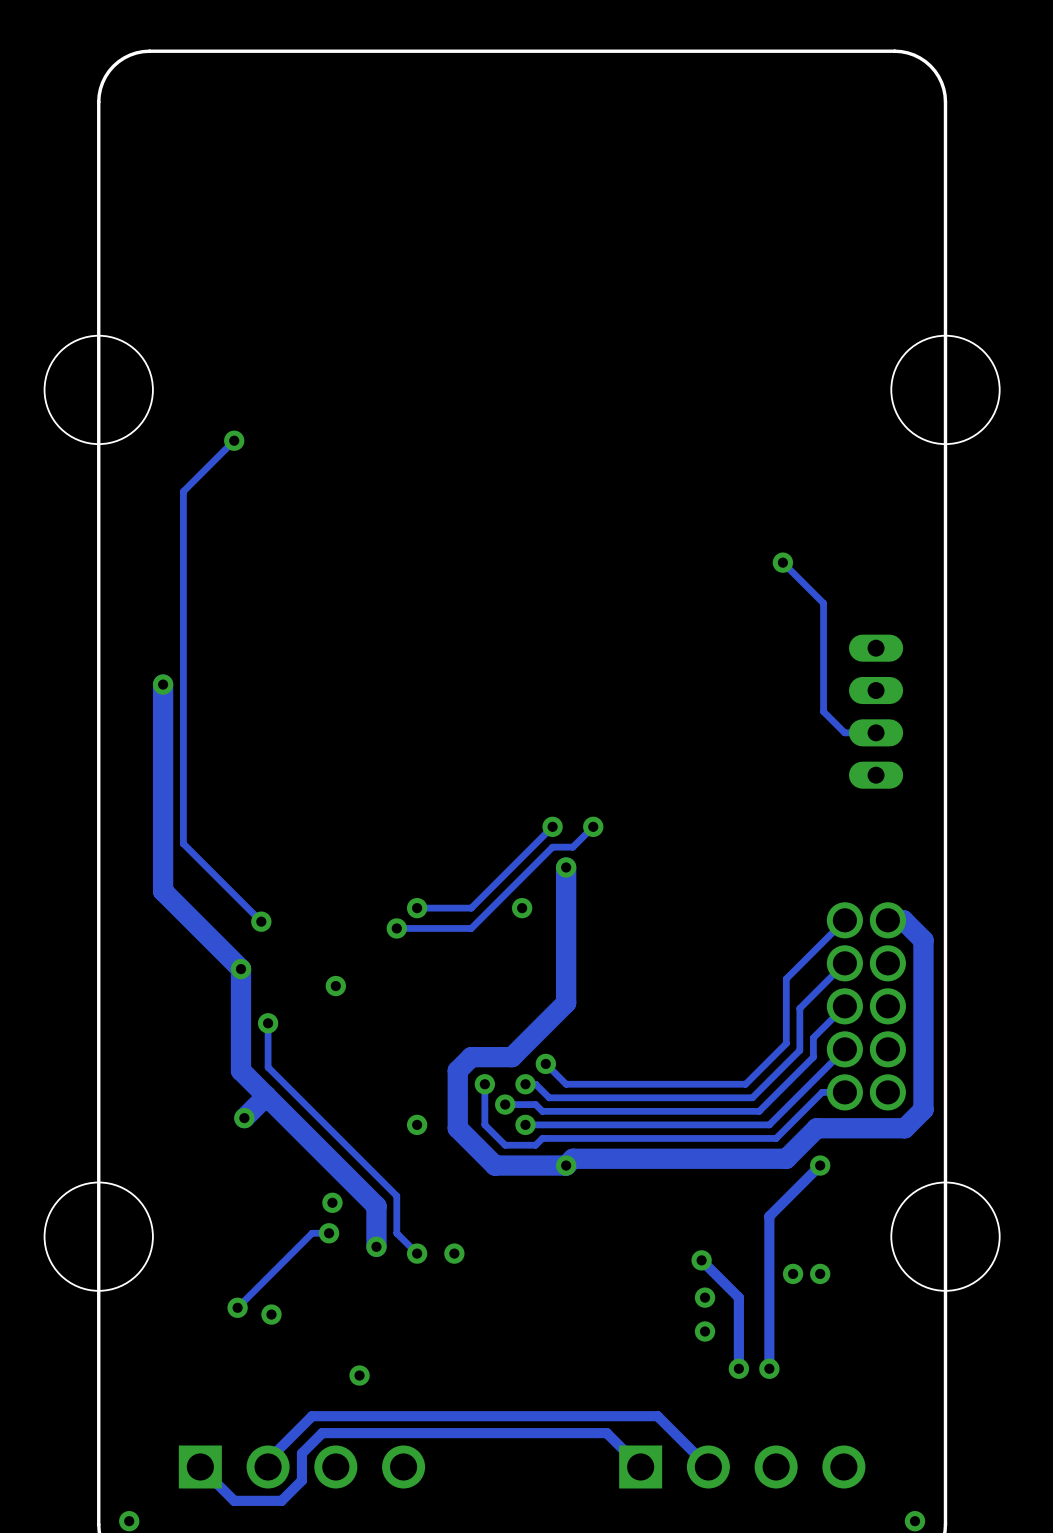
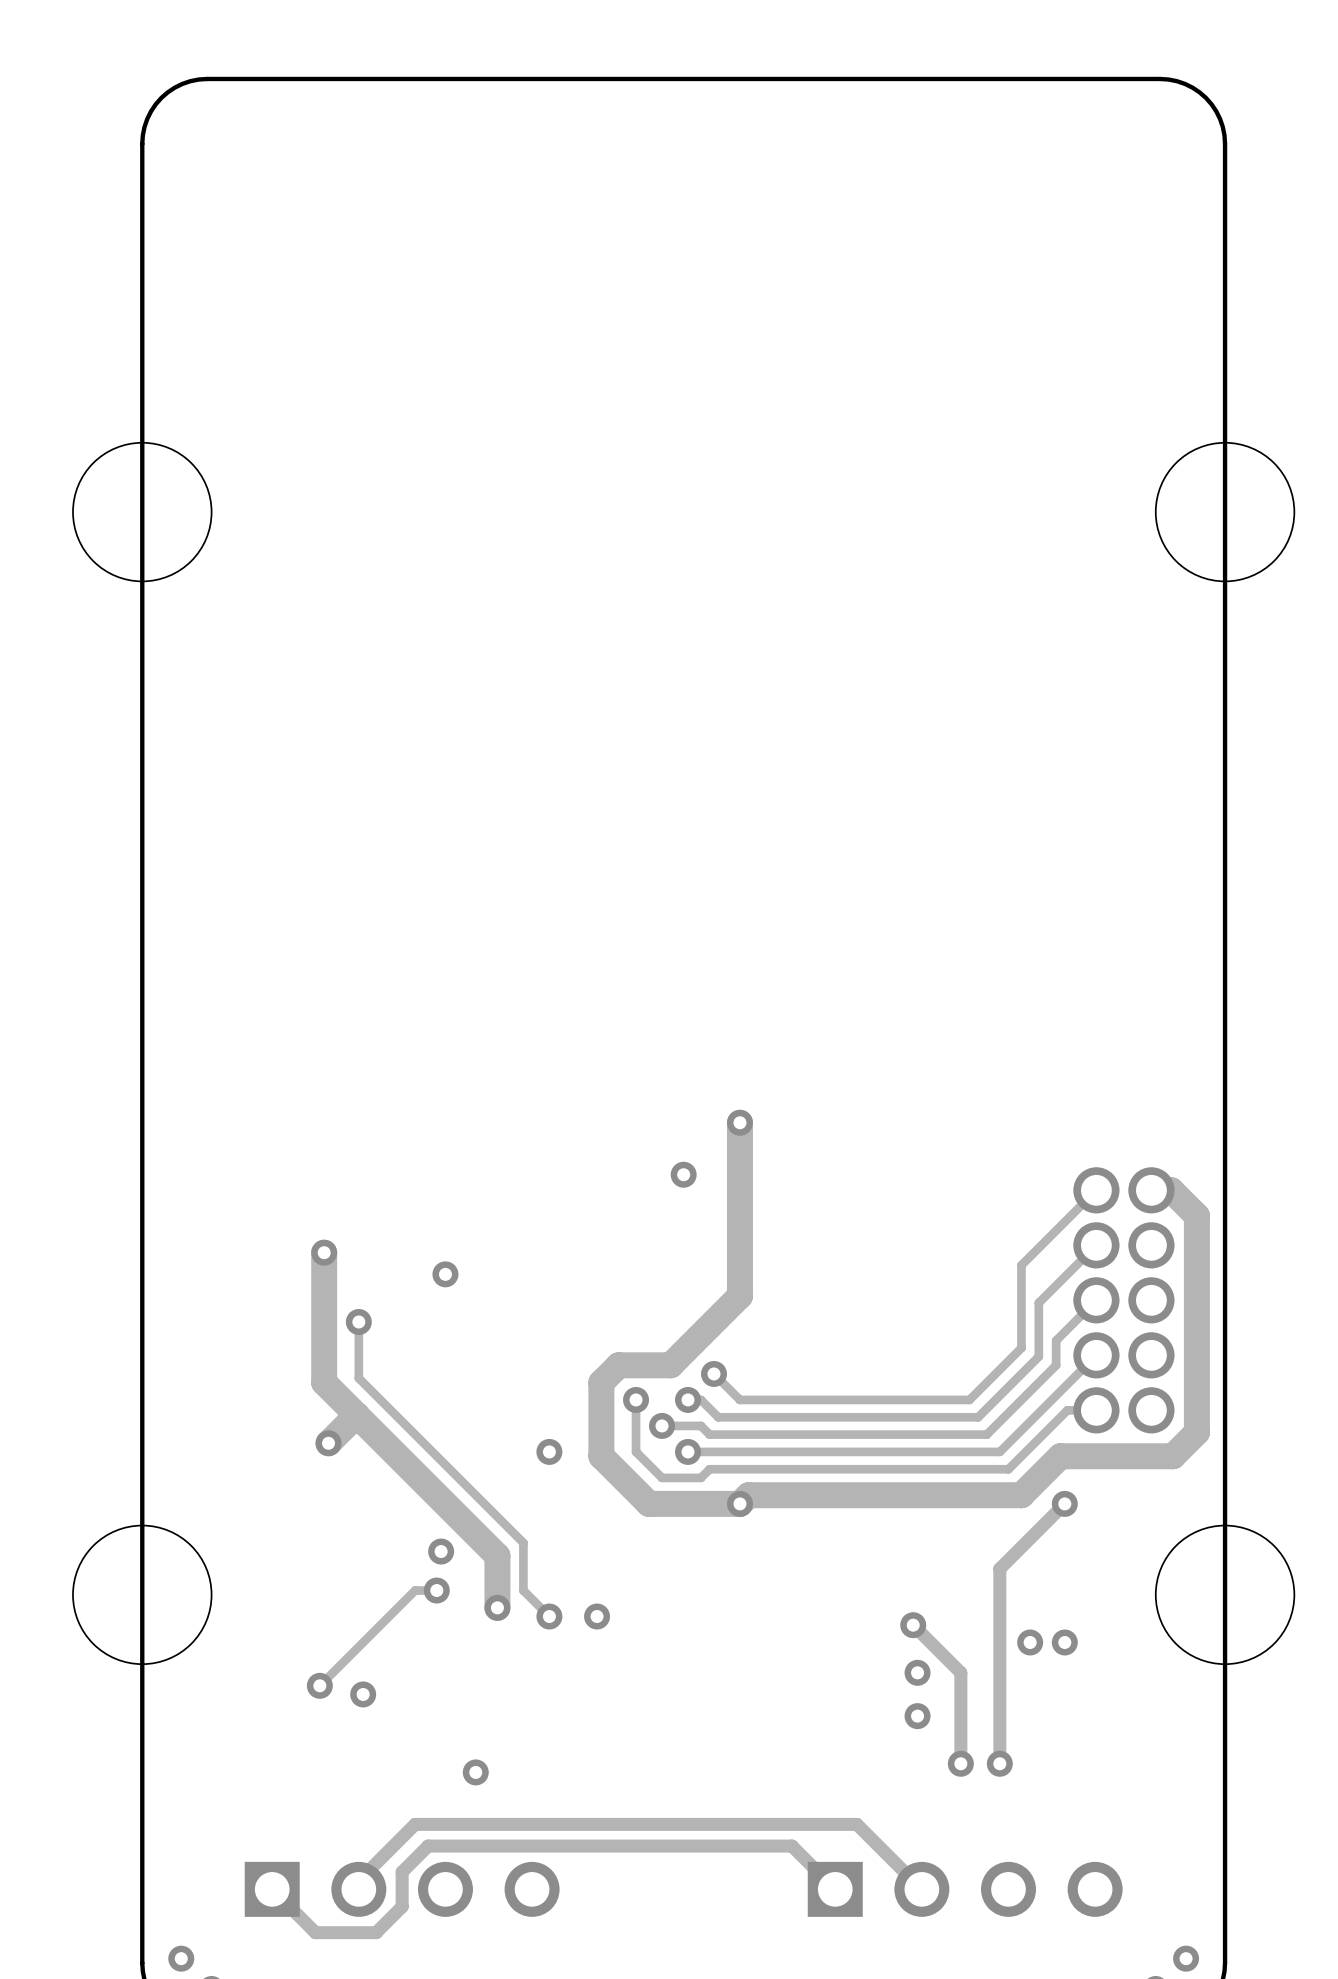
track: (234, 440) (183, 491) (183, 843) (261, 921) -> none
via: (234, 440) -> none
track: (782, 562) (823, 603) (823, 711) (844, 732) (876, 732) -> none
via: (782, 562) -> none
track: (163, 684) (163, 891) (241, 969) -> none
via: (163, 684) -> none
part: (876, 711) -> none
track: (552, 826) (471, 908) (417, 908) -> none
via: (552, 826) -> none
track: (593, 826) (572, 847) (552, 847) (471, 928) (396, 928) -> none
via: (593, 826) -> none
via: (417, 908) -> none
via: (261, 921) -> none
via: (396, 928) -> none

